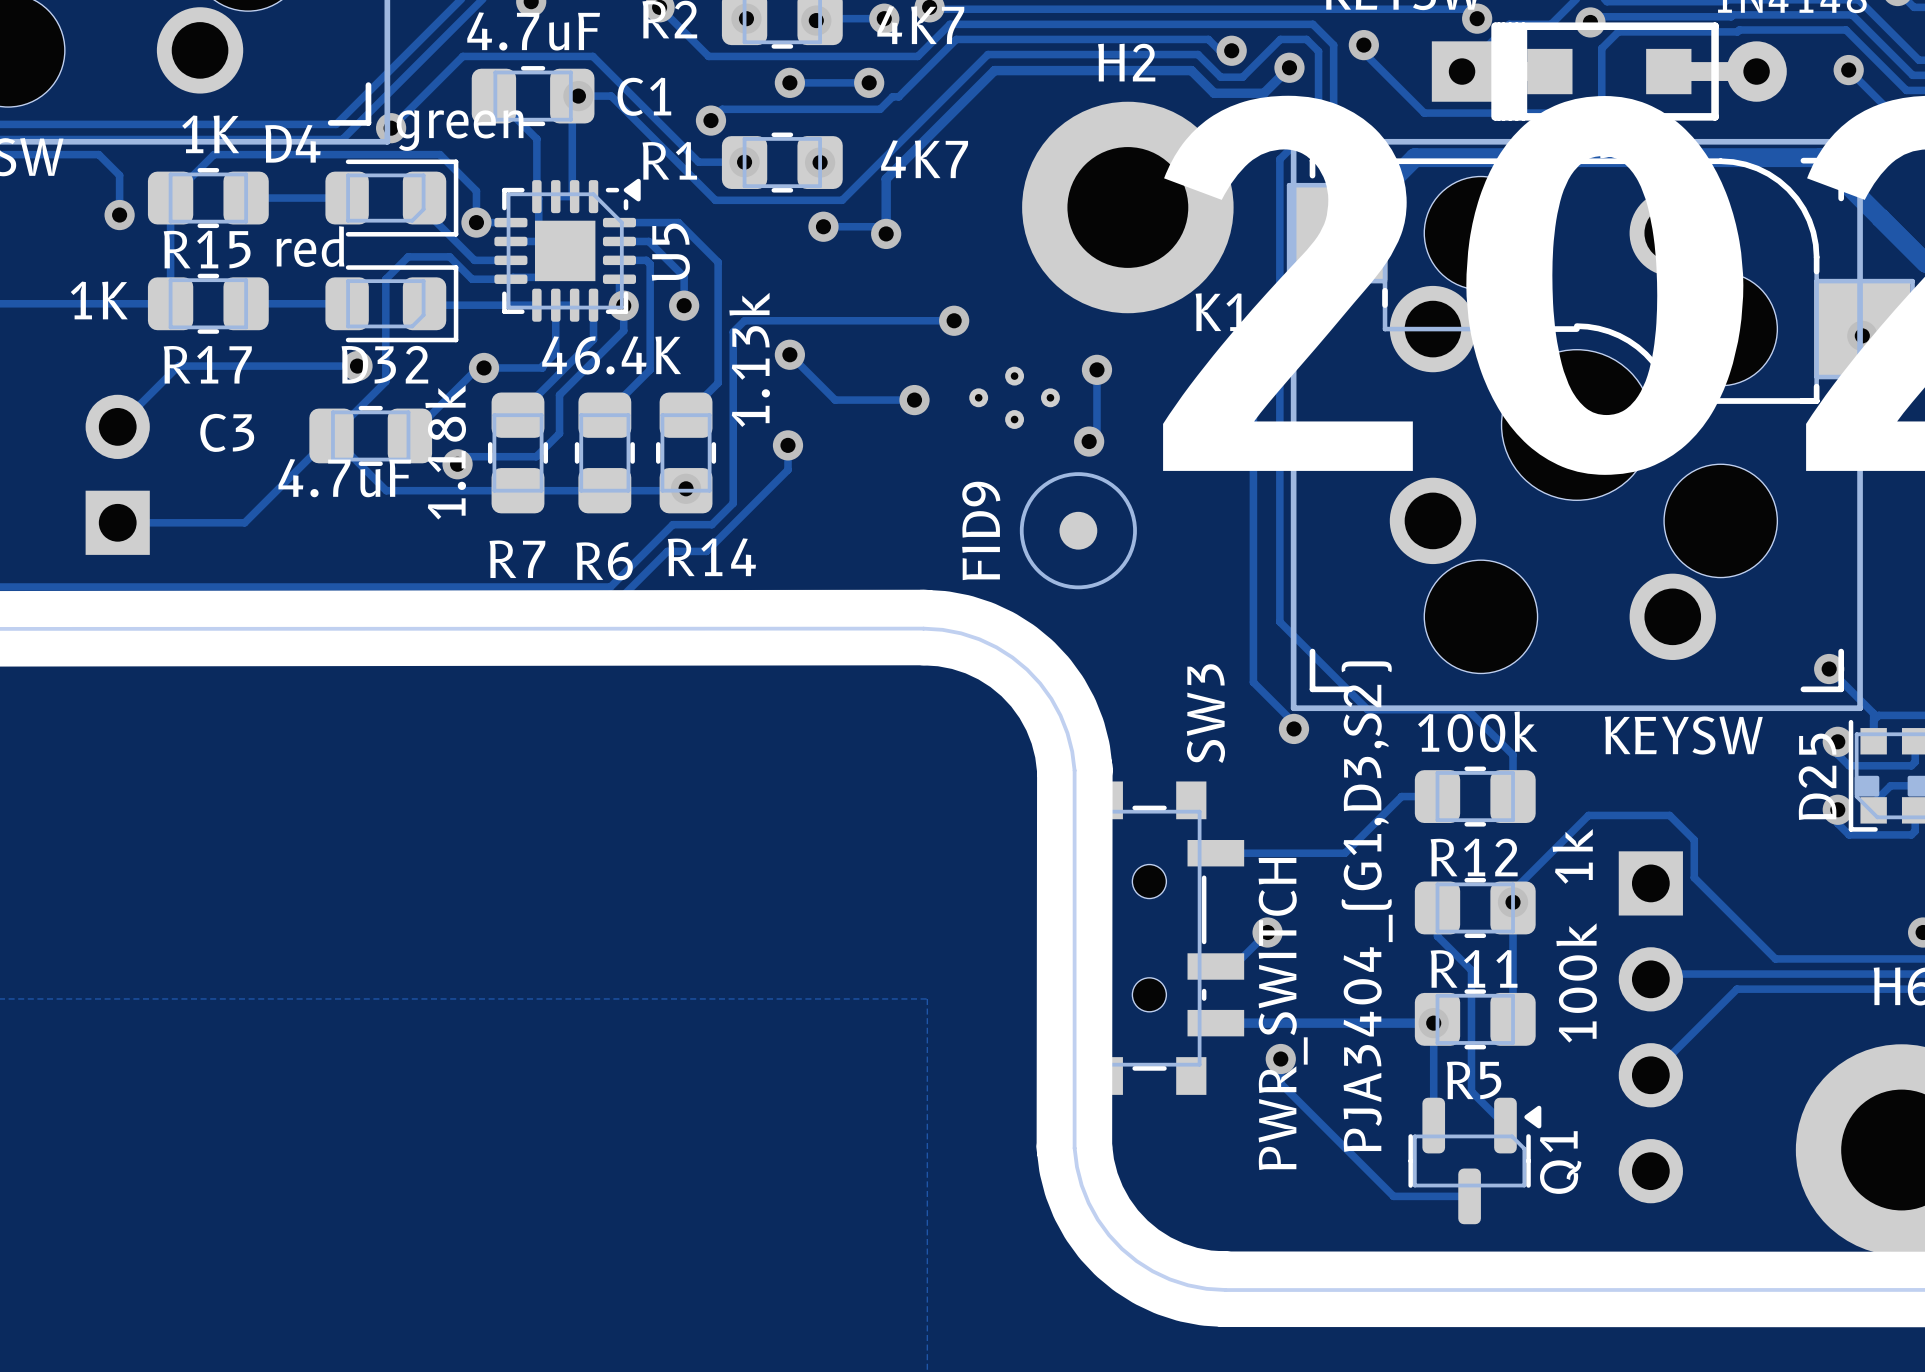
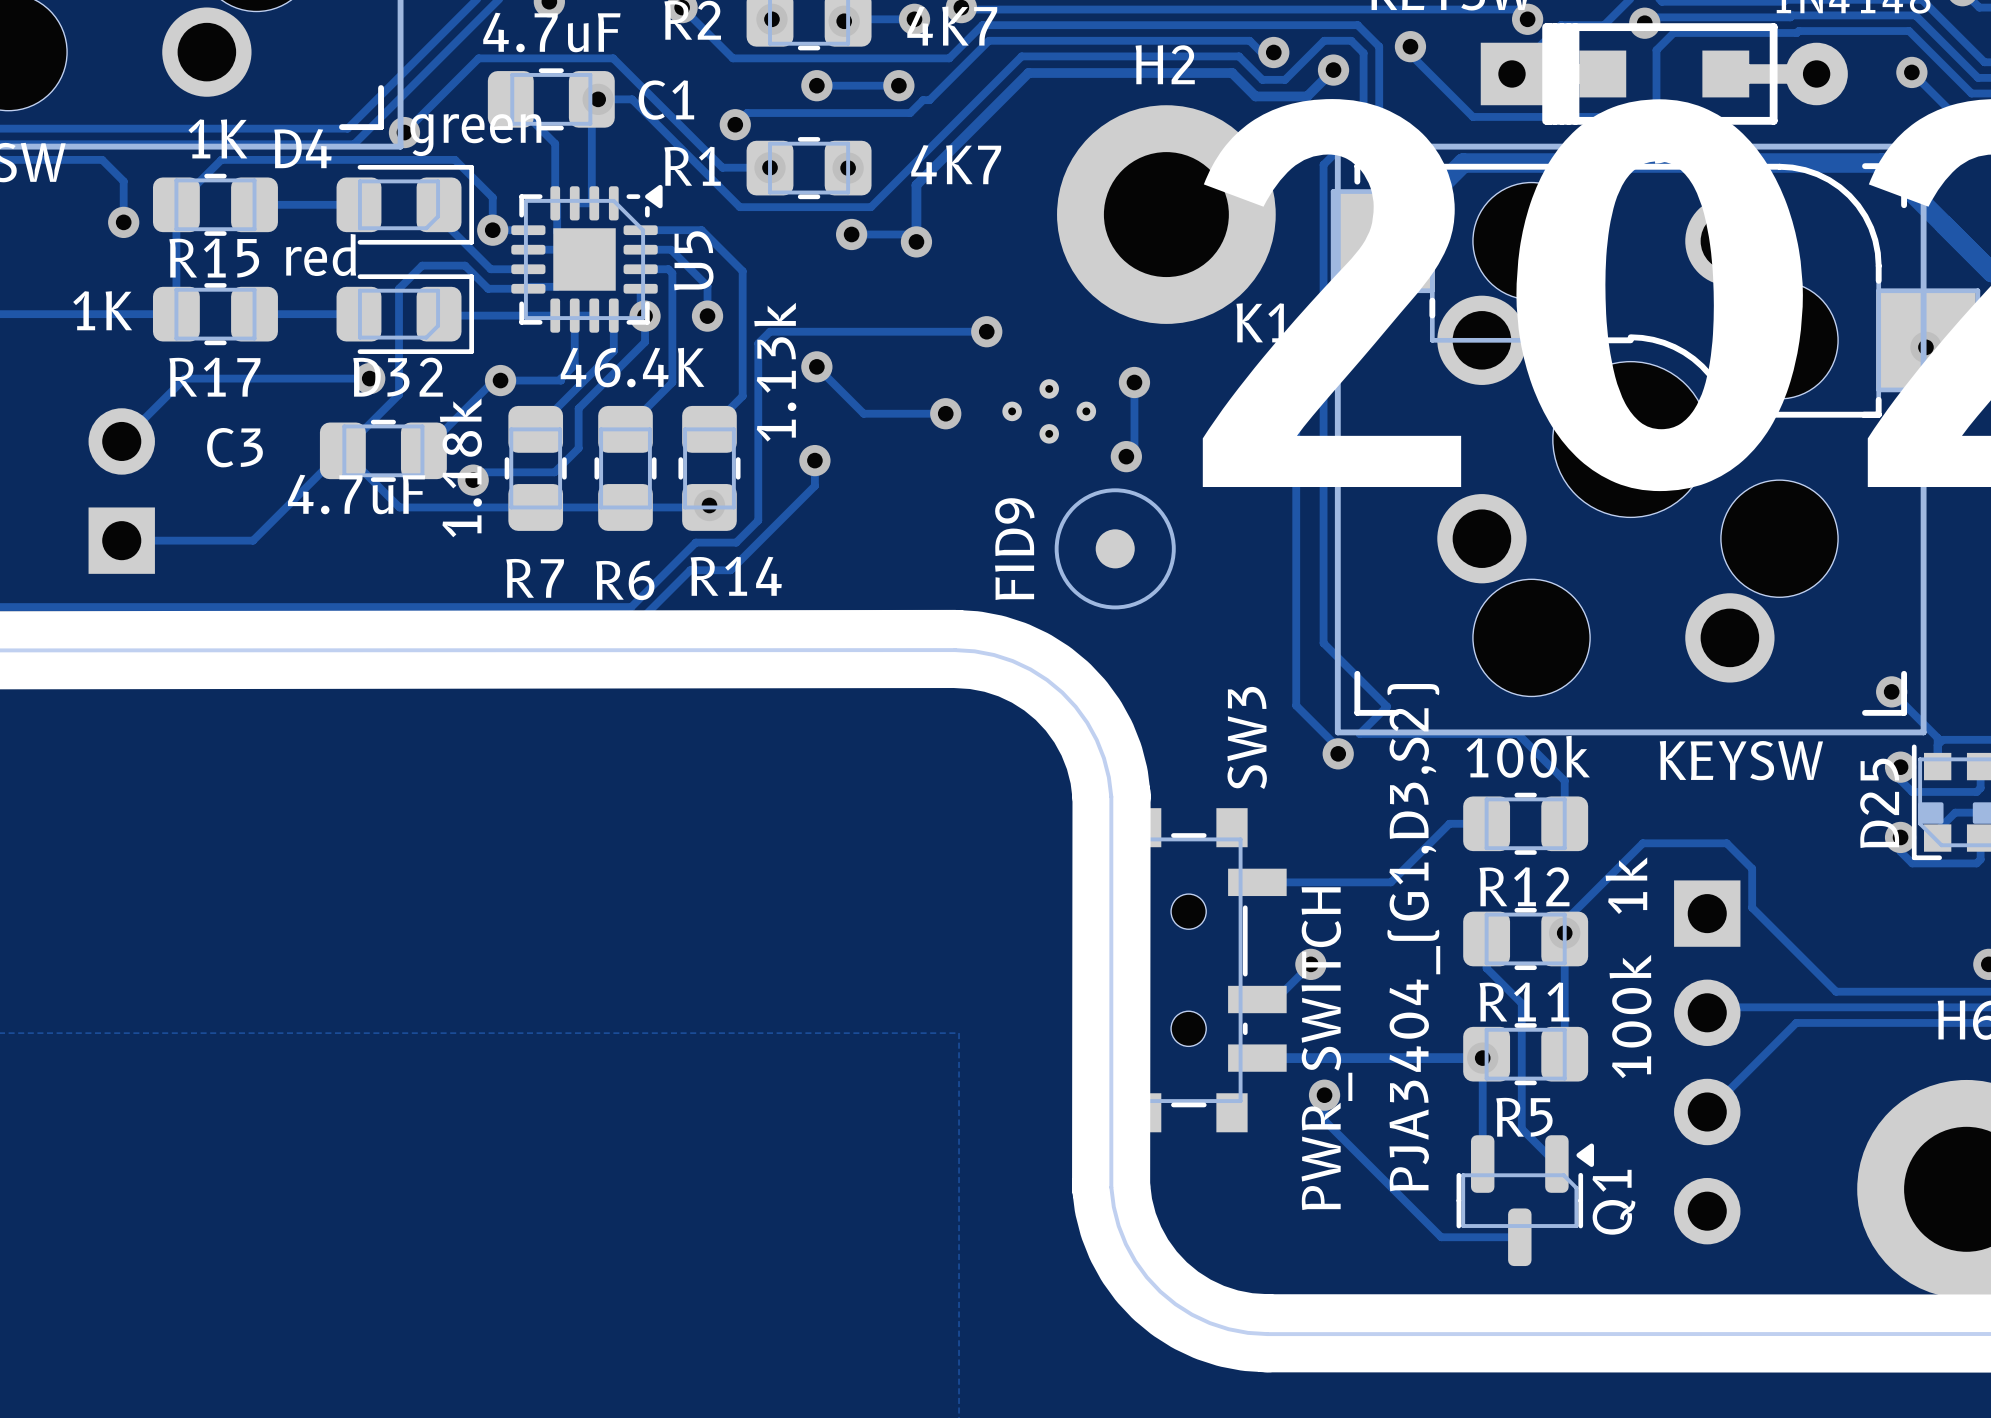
track: (1341, 683) (1367, 709) -> (1387, 706) (1359, 733) (1414, 733)

